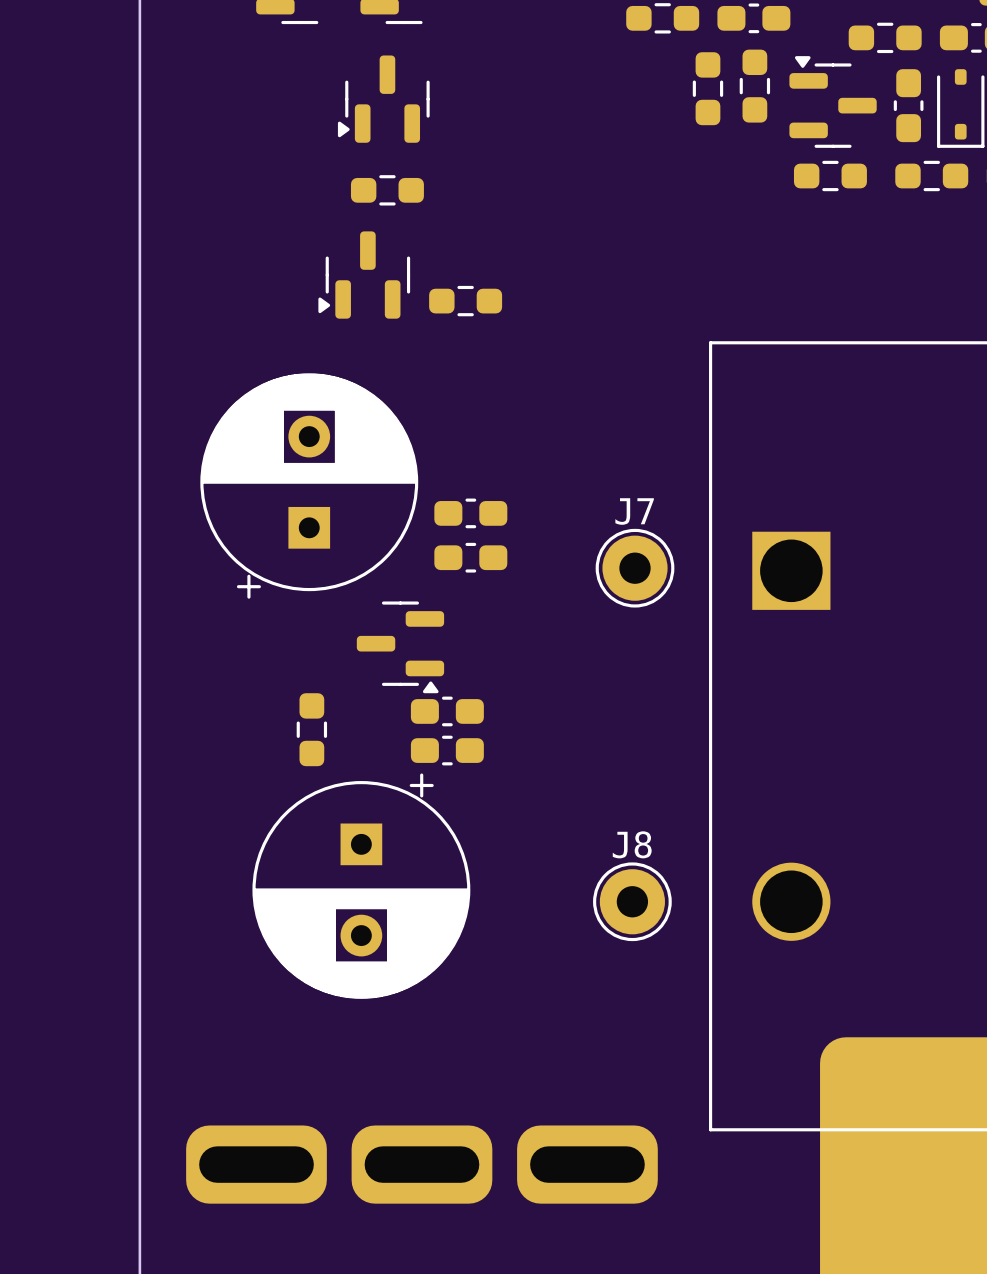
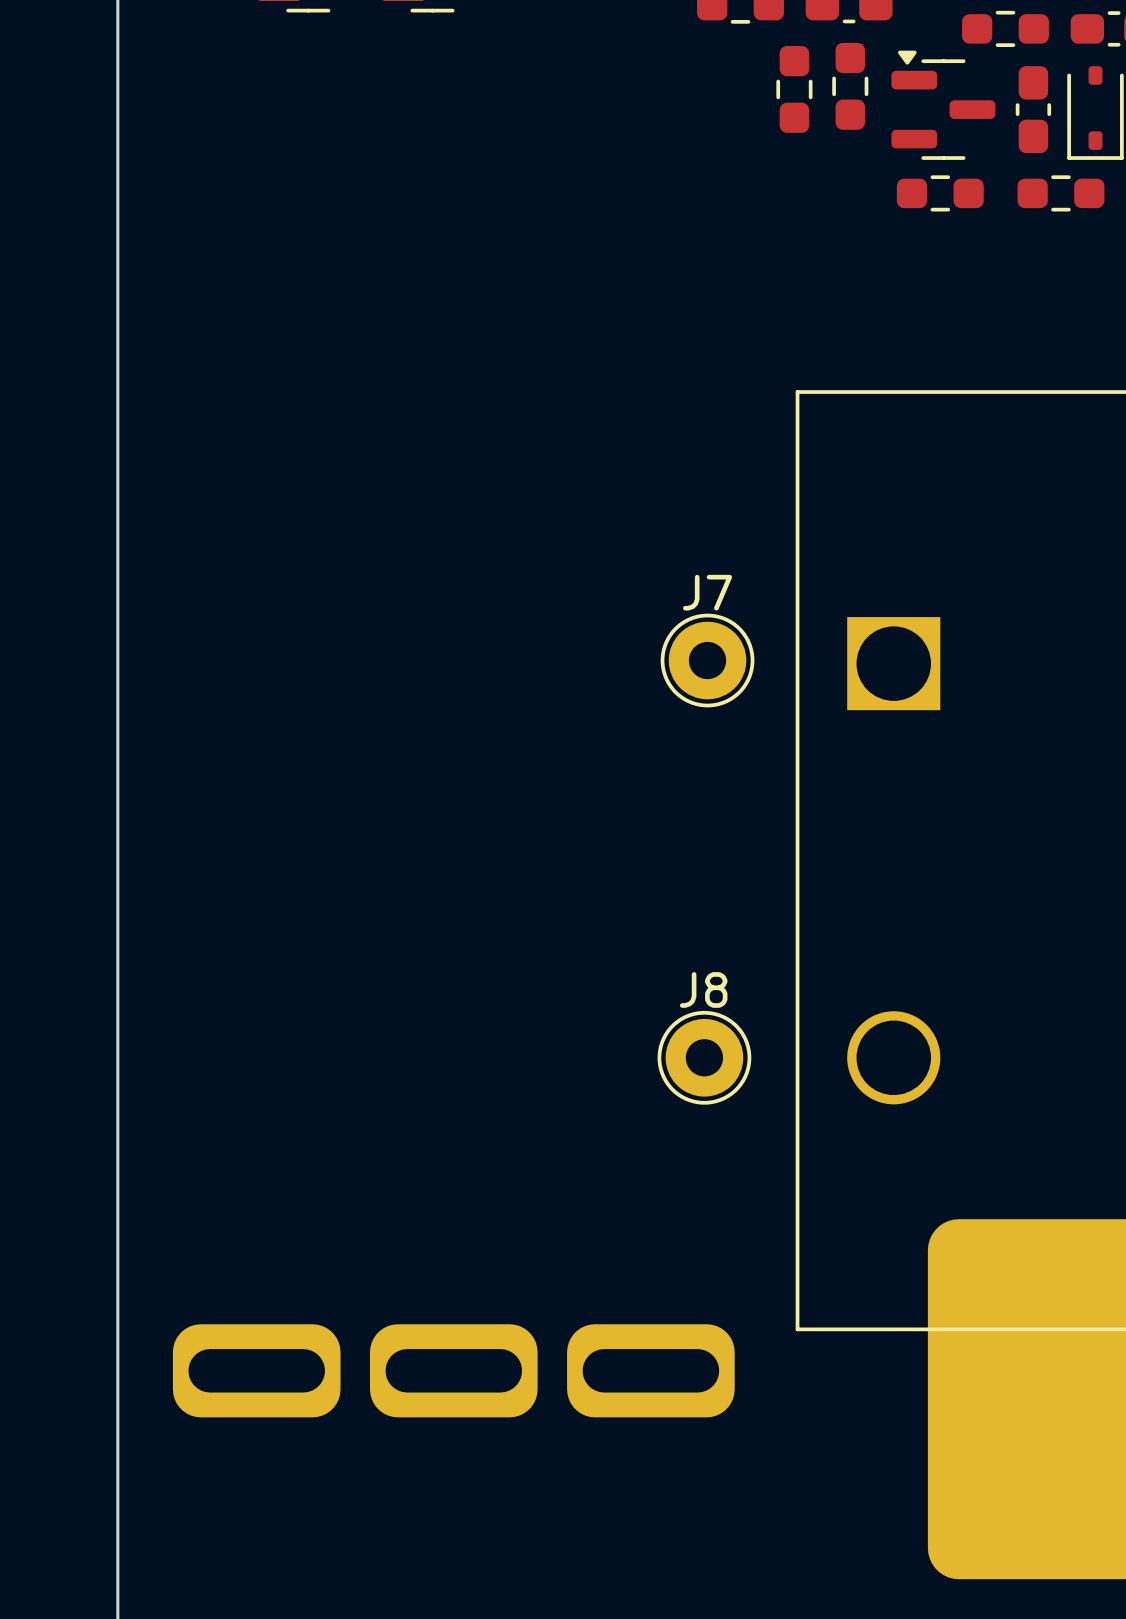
part: (383, 99) -> none
part: (387, 190) -> none
part: (364, 275) -> none
part: (465, 301) -> none
part: (309, 485) -> none
part: (470, 513) -> none
part: (470, 557) -> none
part: (400, 647) -> none
part: (447, 711) -> none
part: (311, 729) -> none
part: (447, 750) -> none
part: (361, 886) -> none

